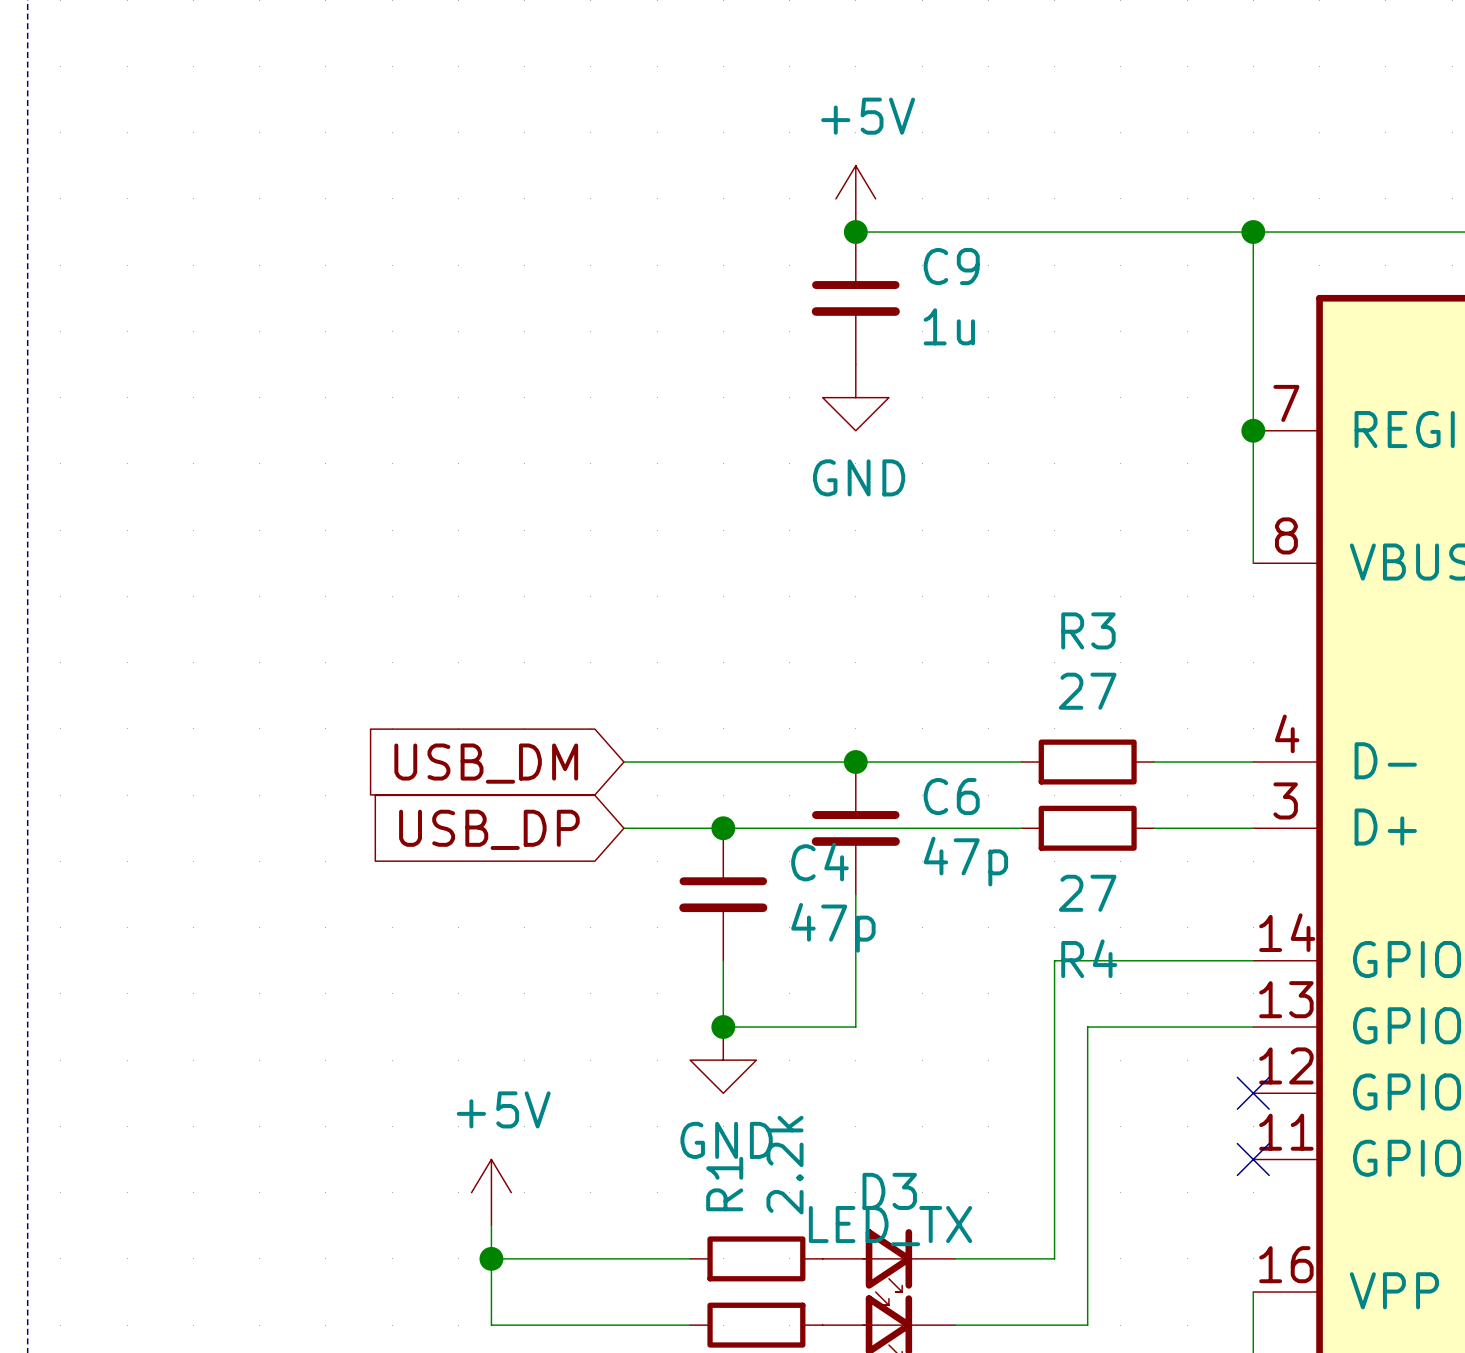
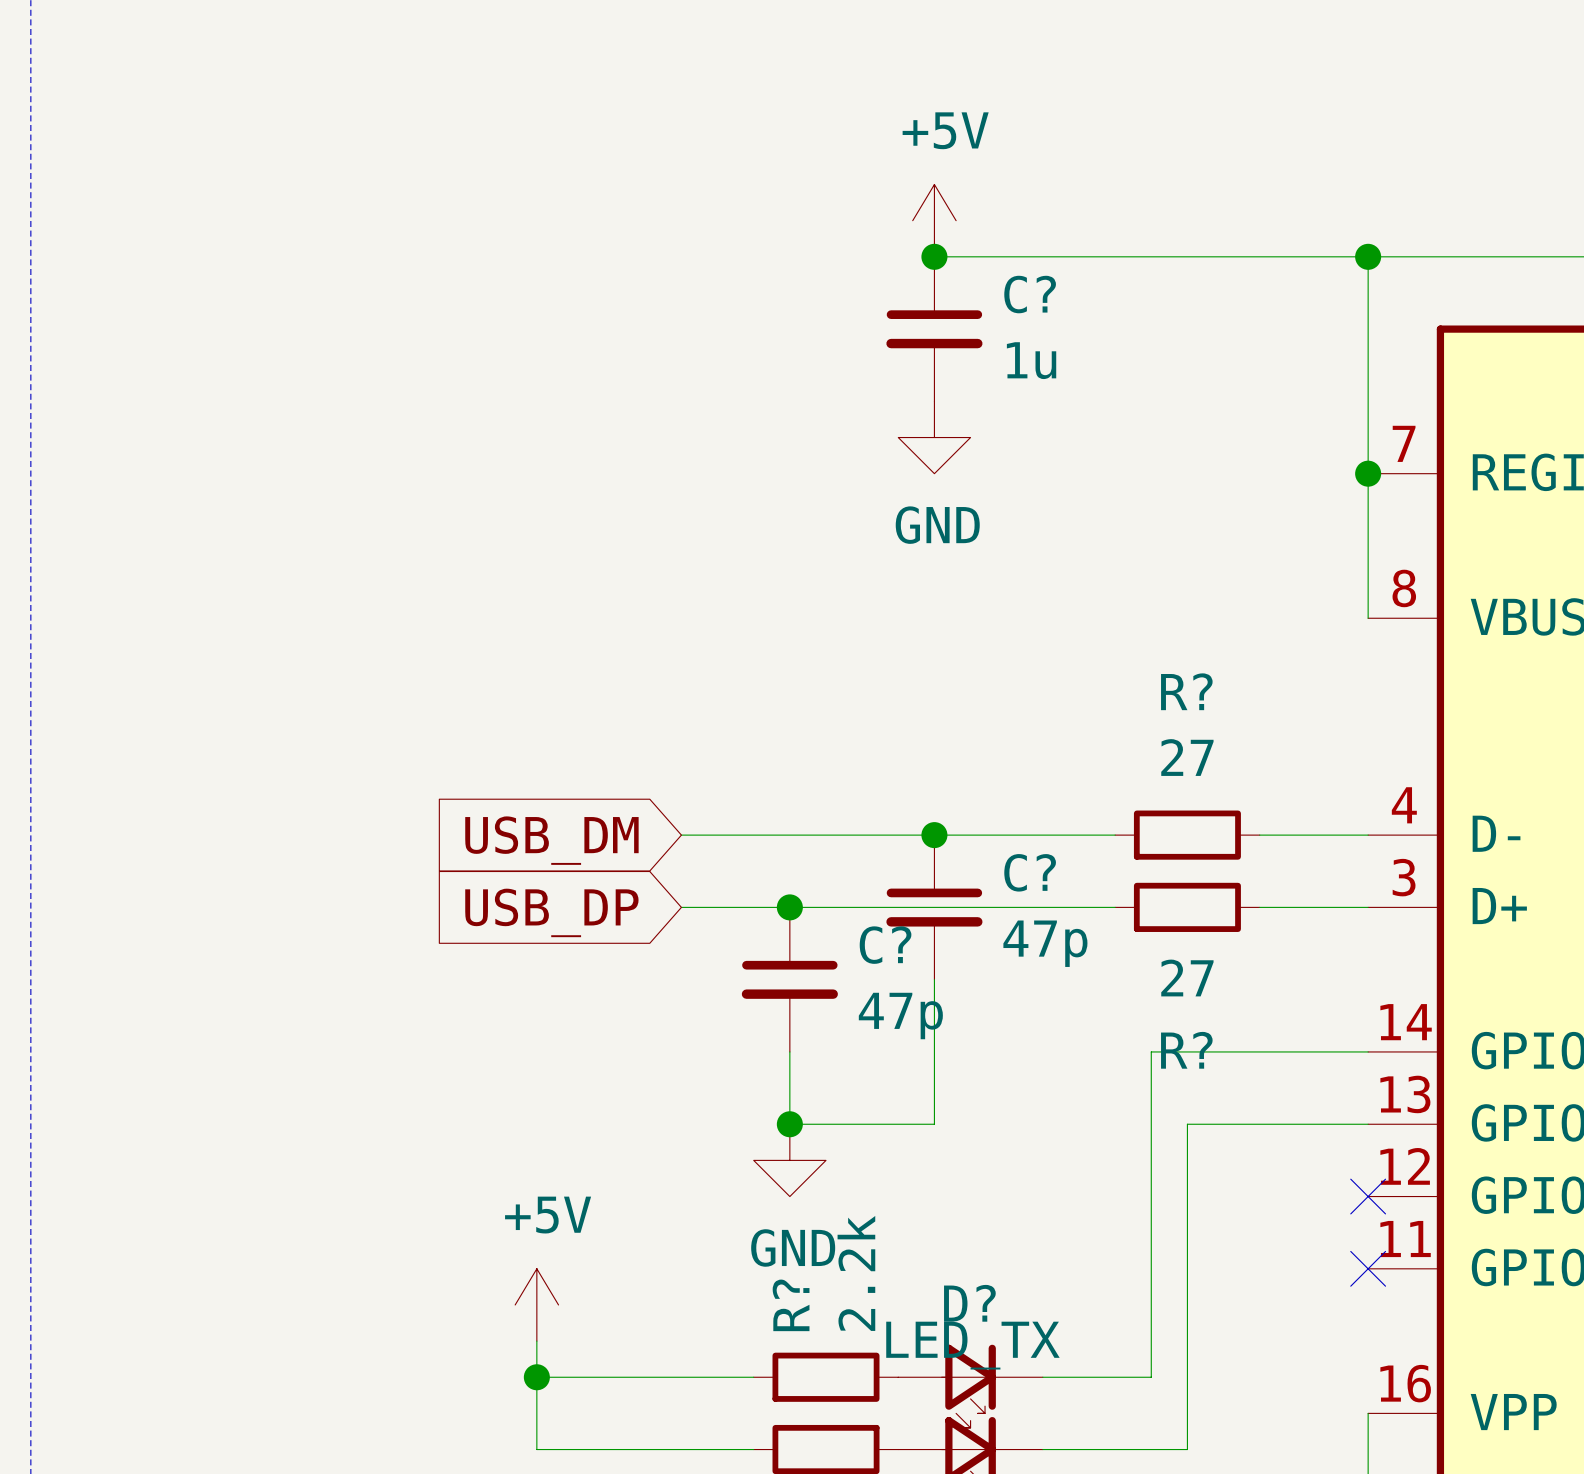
C9 name: C9 (951, 266) -> C? (1030, 294)
R3 name: R3 (1088, 630) -> R? (1186, 691)
C6 name: C6 (951, 796) -> C? (1030, 872)
C4 name: C4 (819, 862) -> C? (885, 945)
R4 name: R4 (1089, 958) -> R? (1186, 1050)
R1 name: R1 (724, 1184) -> R? (791, 1305)
D3 name: D3 (889, 1191) -> D? (969, 1303)

